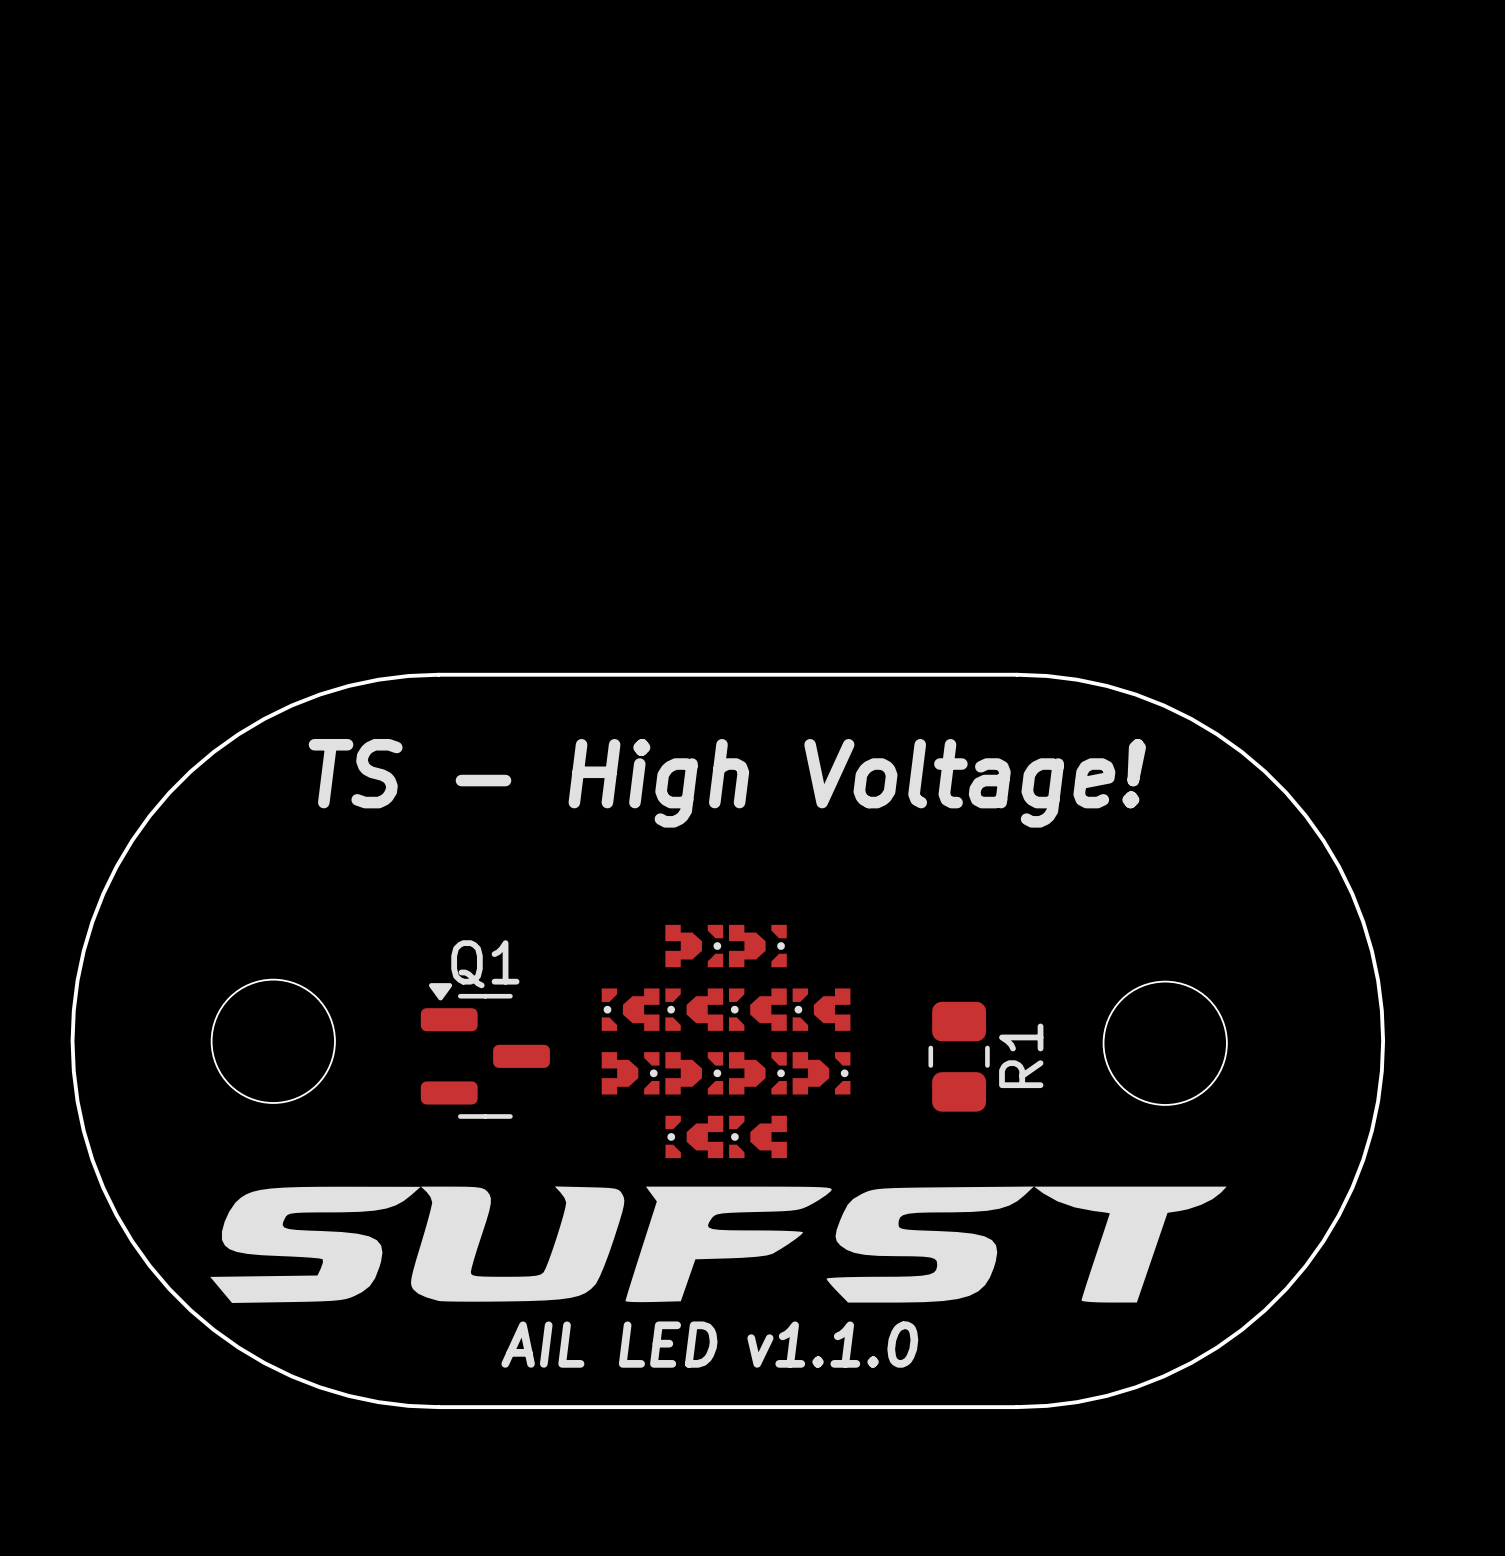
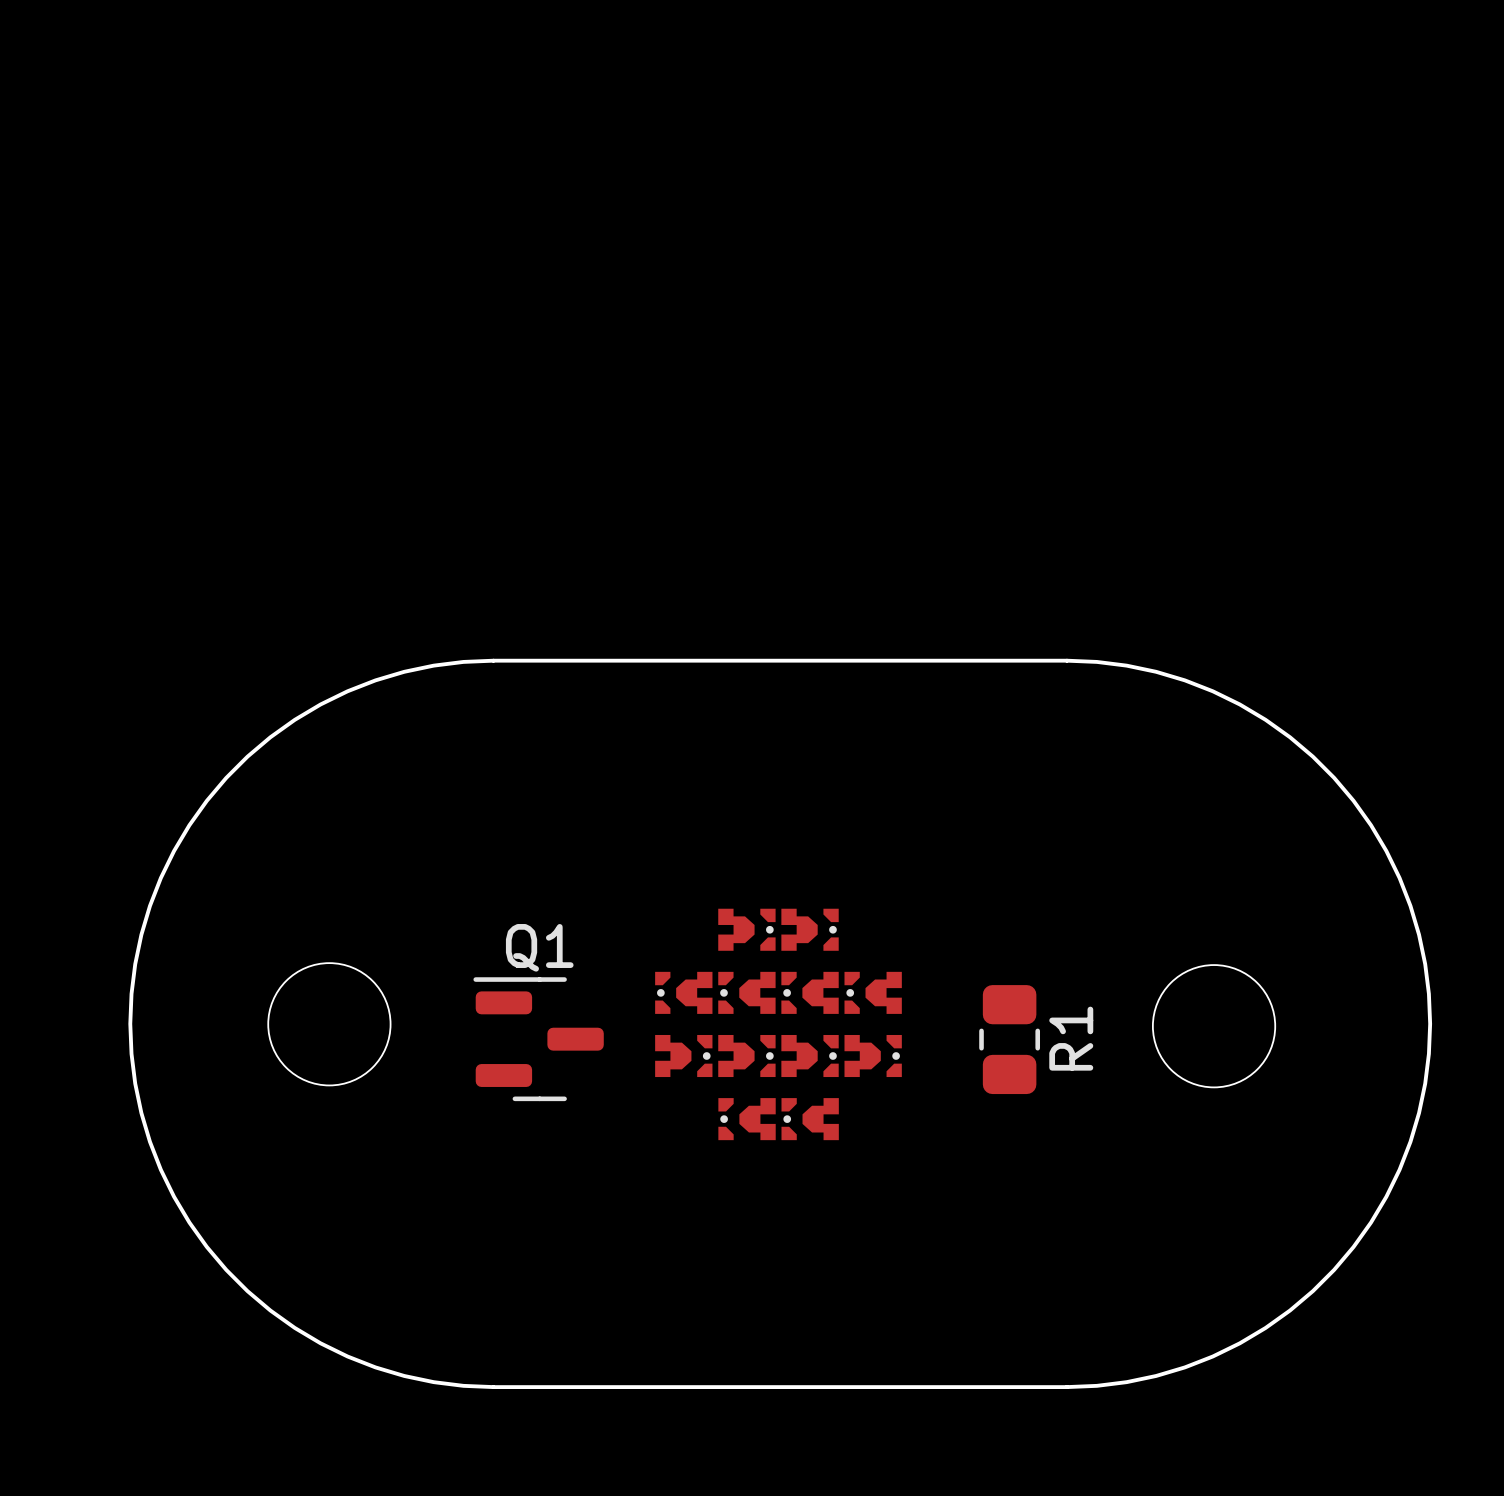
text: TS - High Voltage! (727, 783) -> none
Q1 footprint: [420, 983, 550, 1119] -> [473, 977, 604, 1102]
drawing: [210, 1186, 1227, 1303] -> none
text: AIL LED (609, 1344) -> none
text: v1.1.0 (832, 1344) -> none

